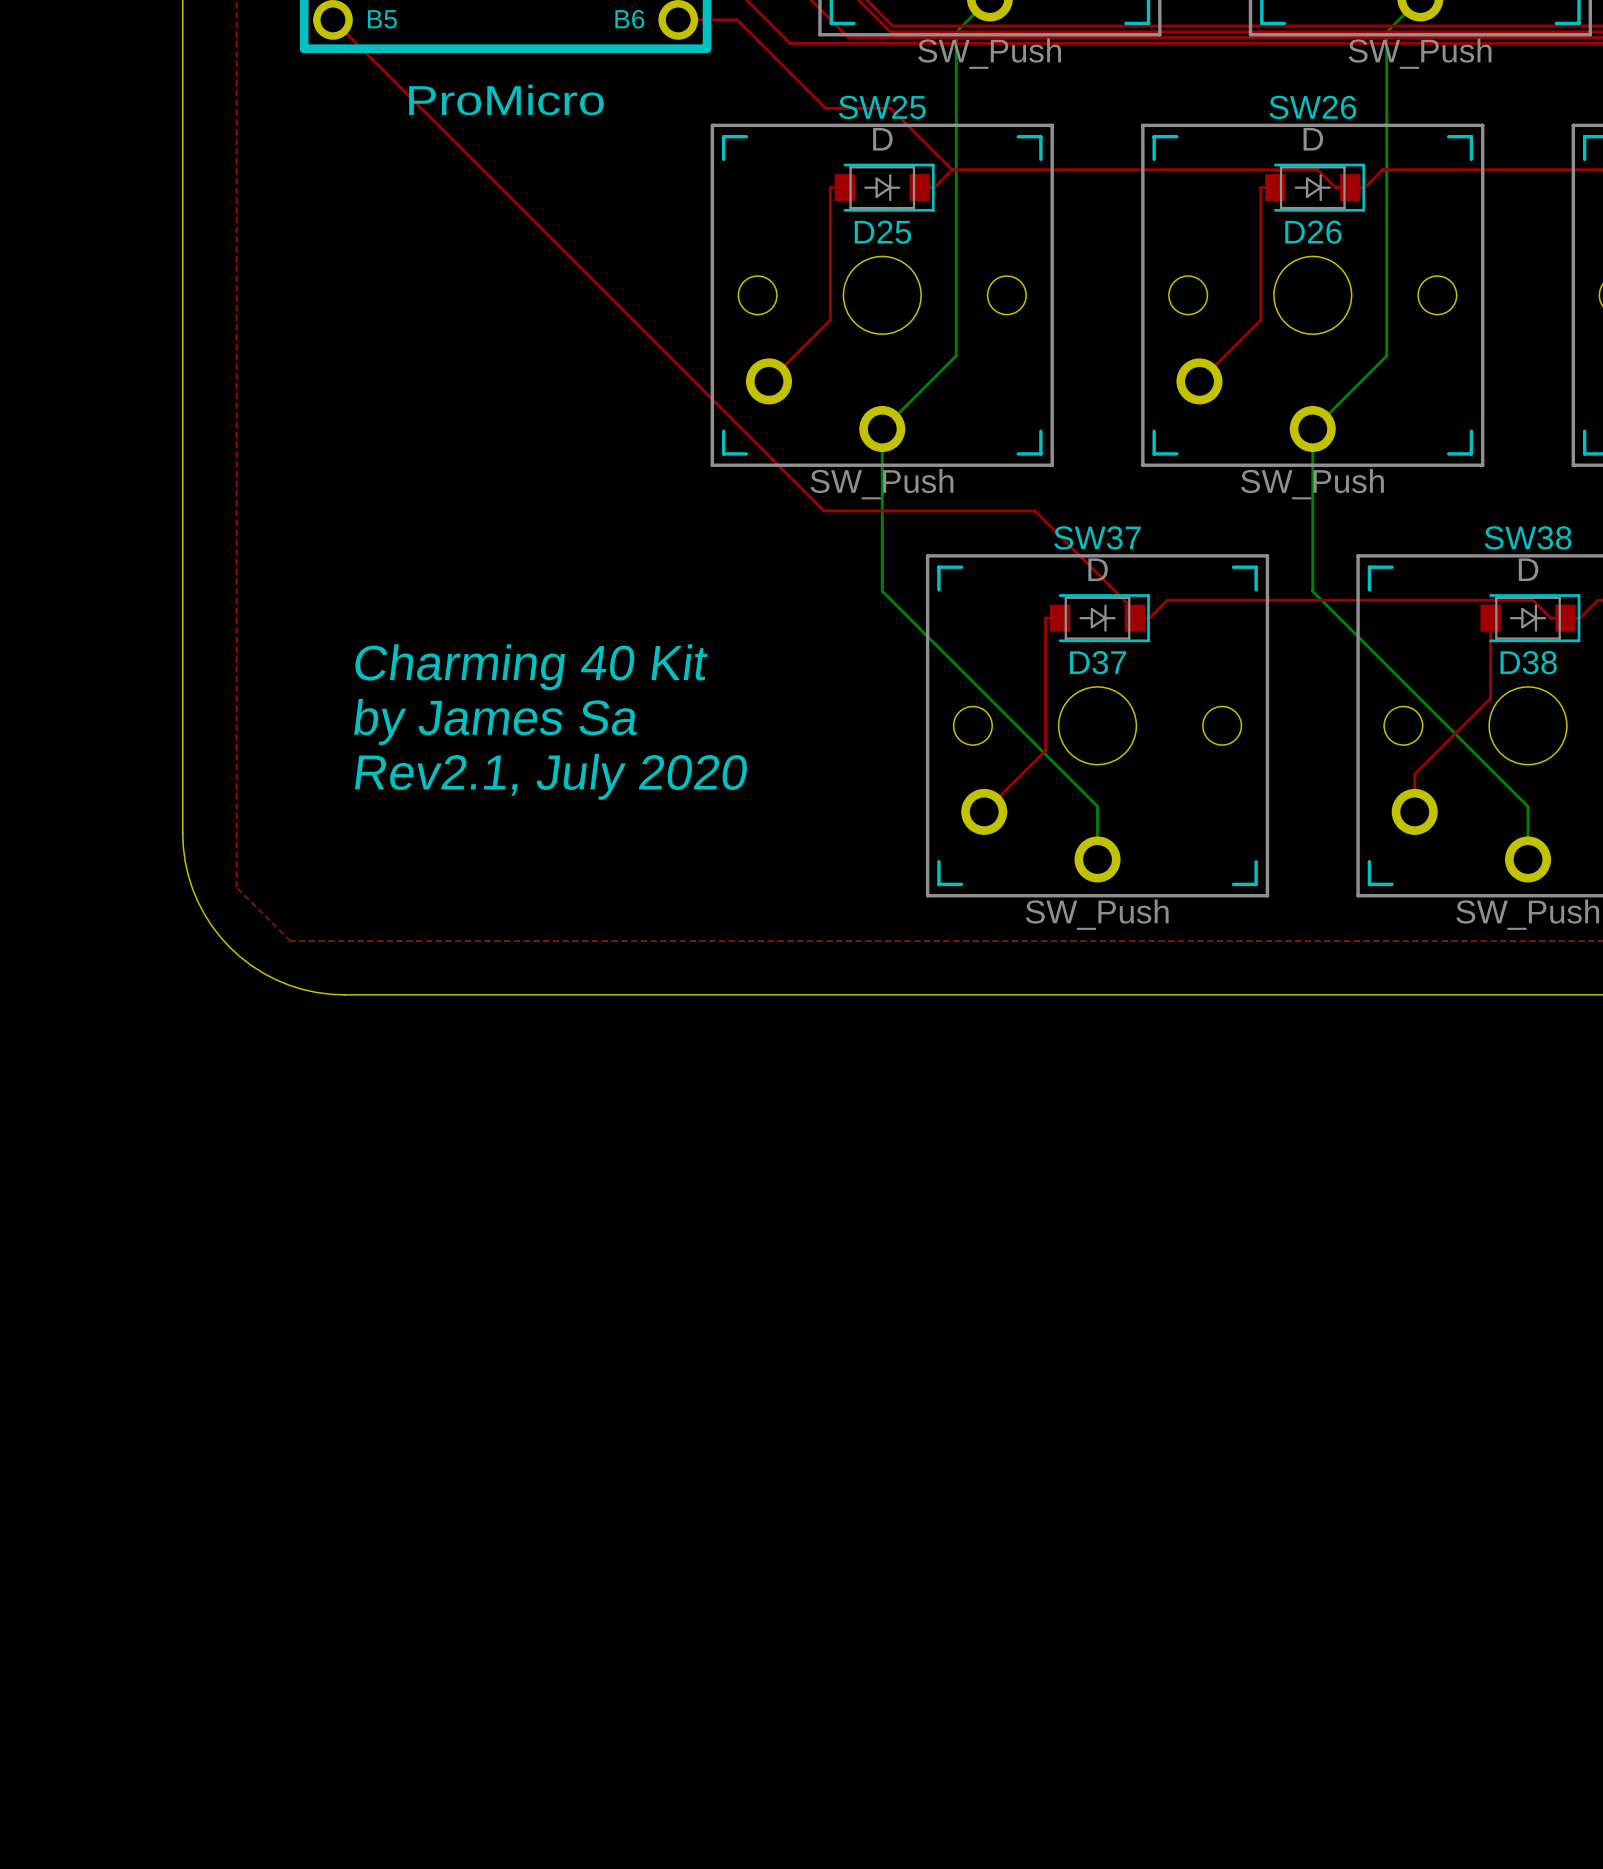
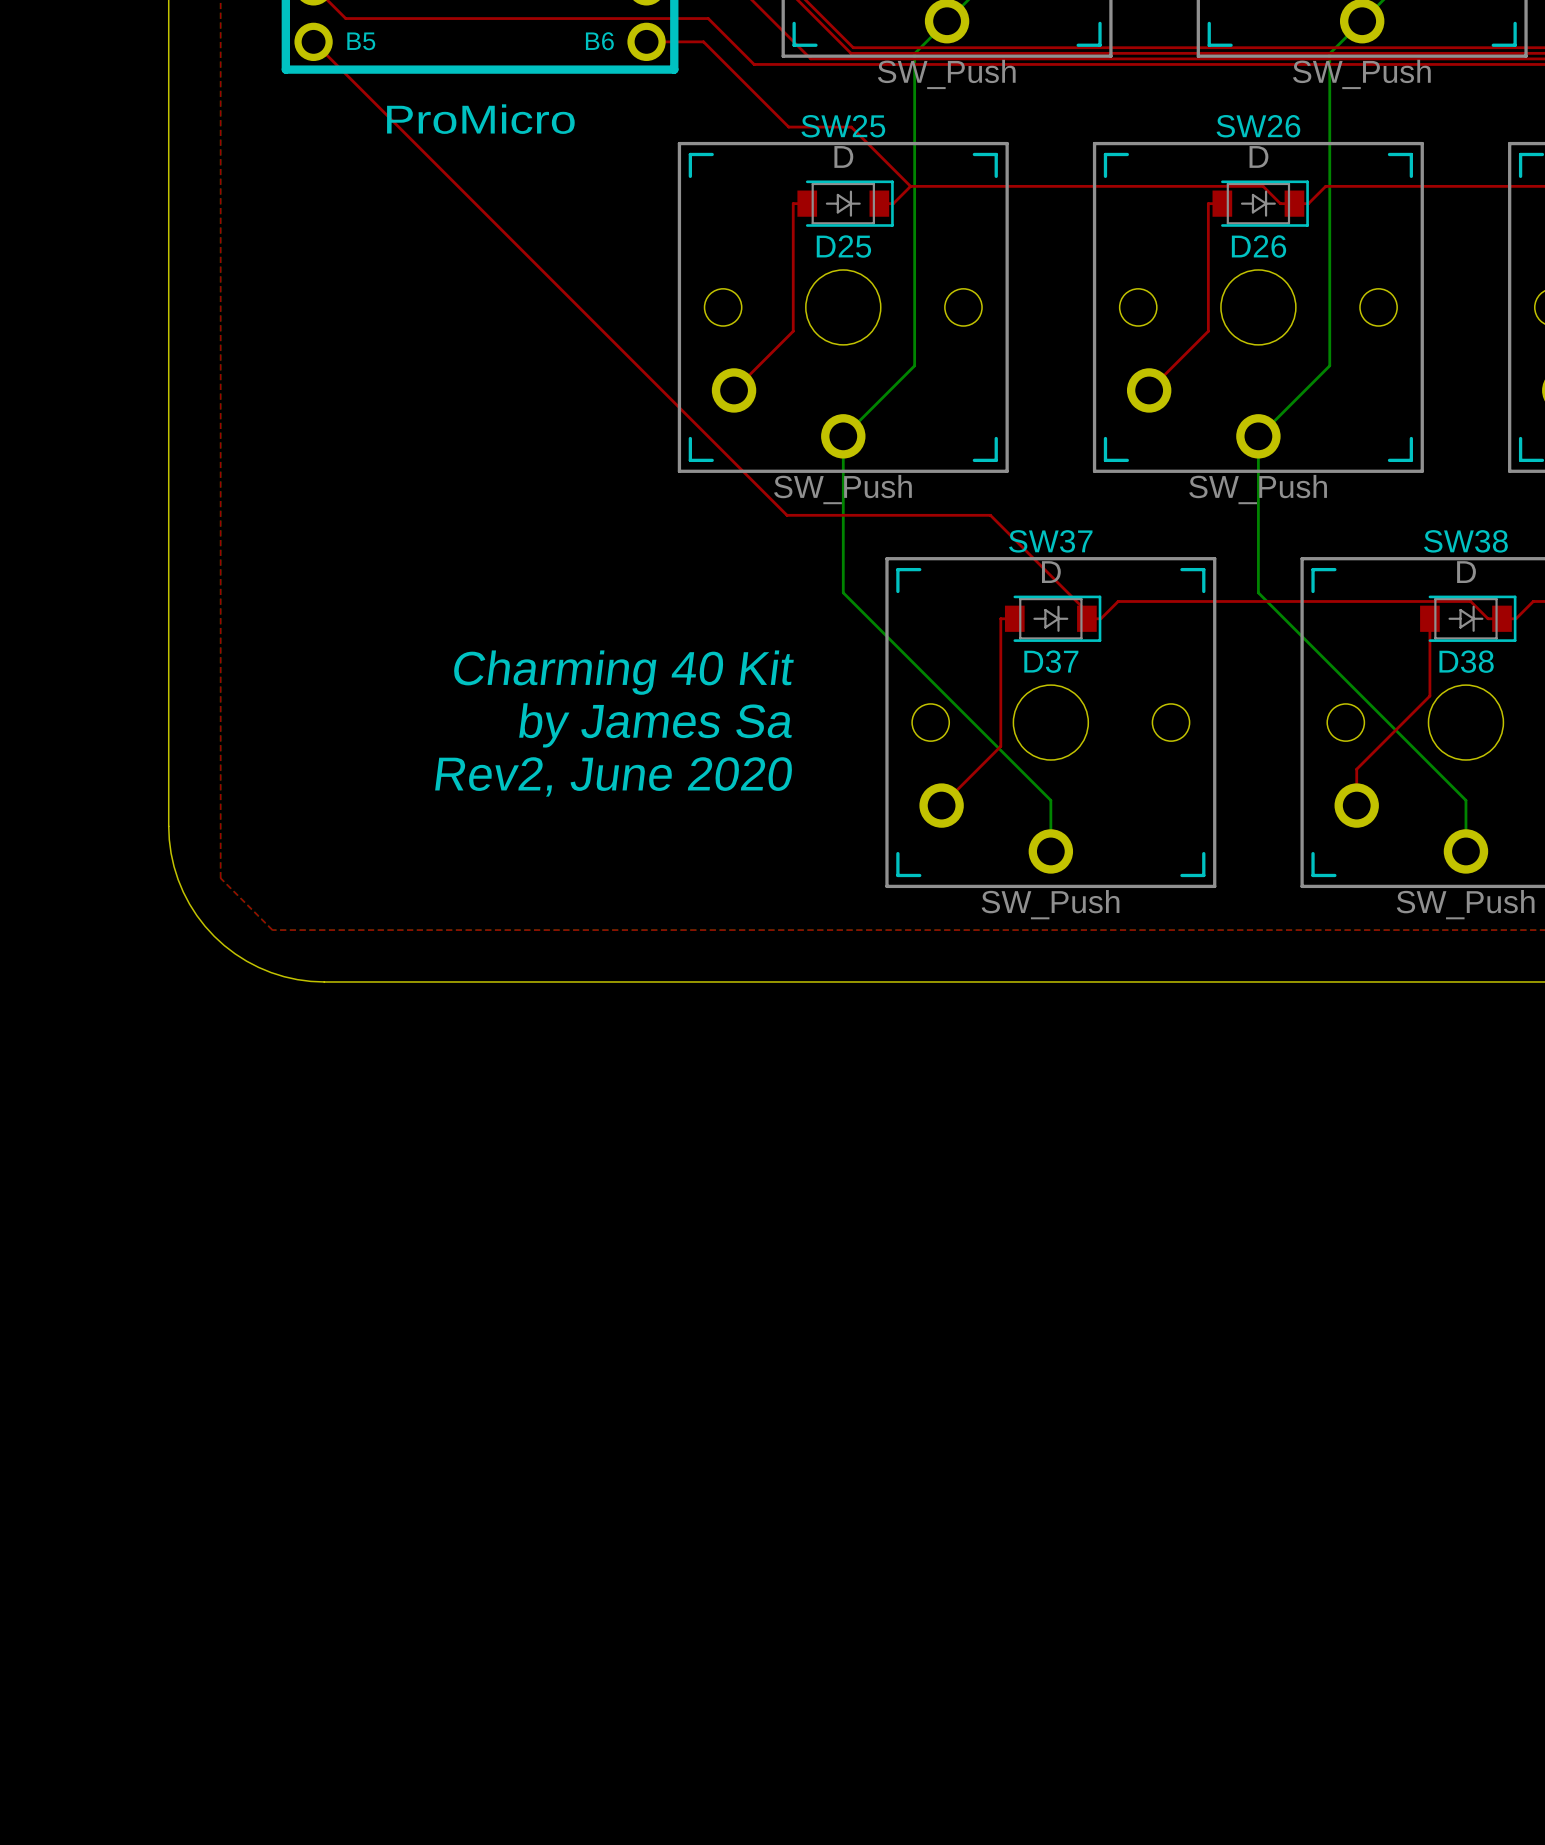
text position: Charming 40 Kit (531, 667) -> Charming 40 Kit (623, 672)
text position: by James Sa (495, 722) -> by James Sa (655, 725)
text: Rev2.1, July 2020 (551, 776) -> Rev2, June 2020 (613, 776)

